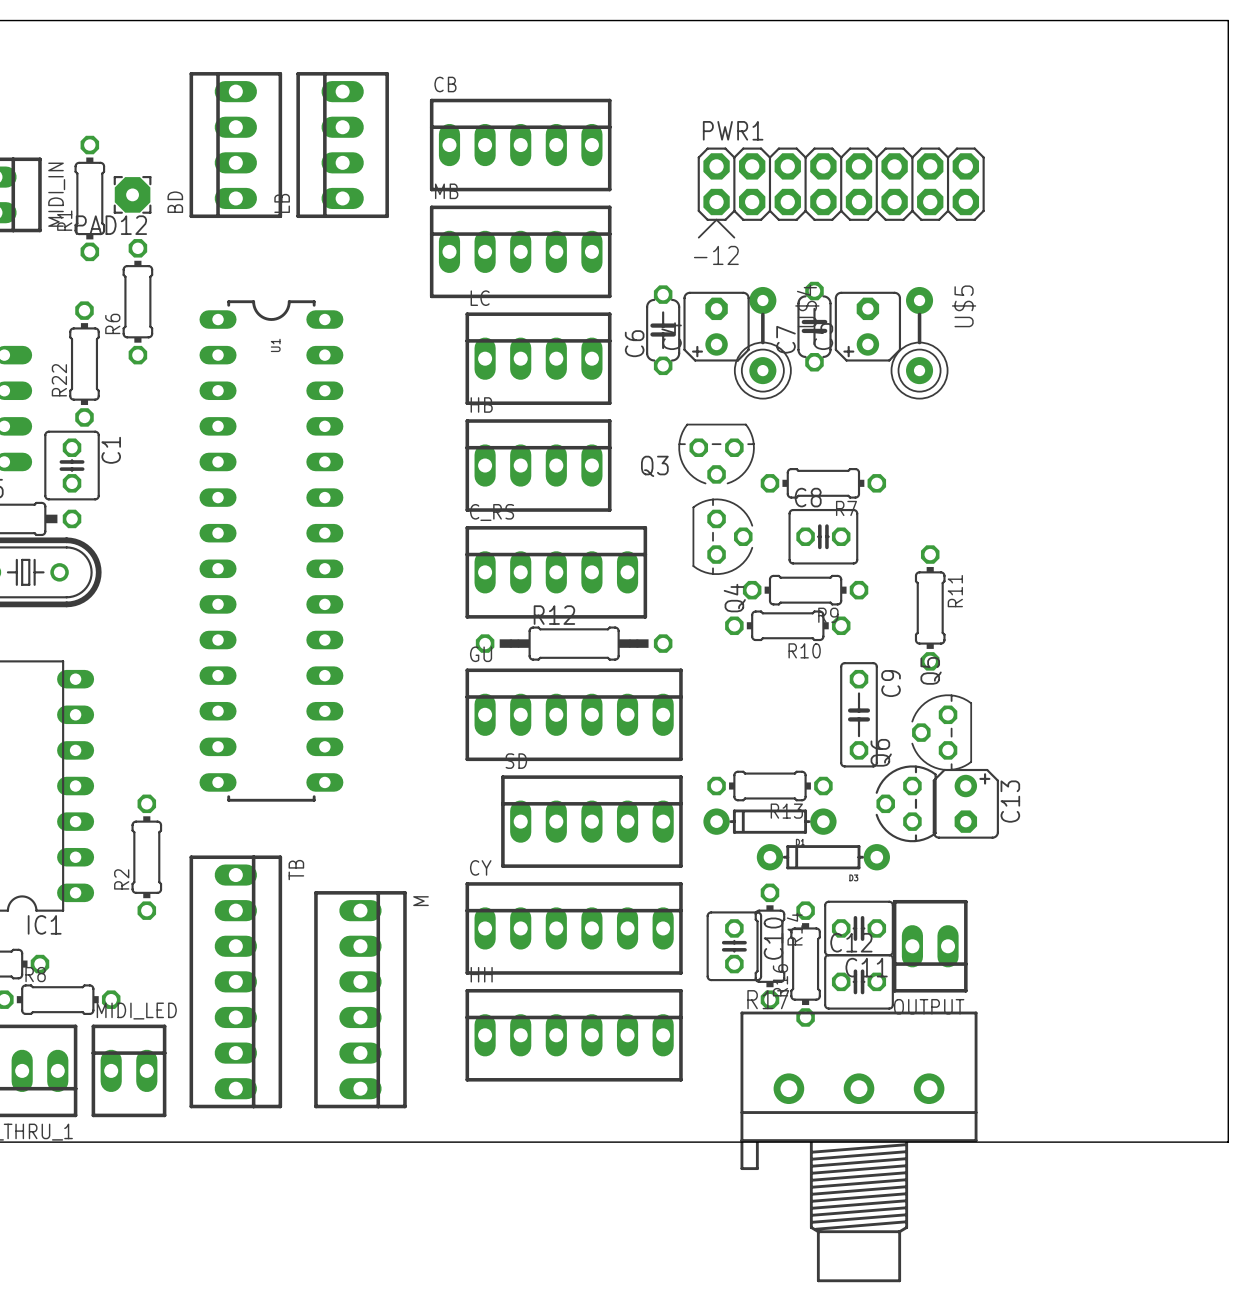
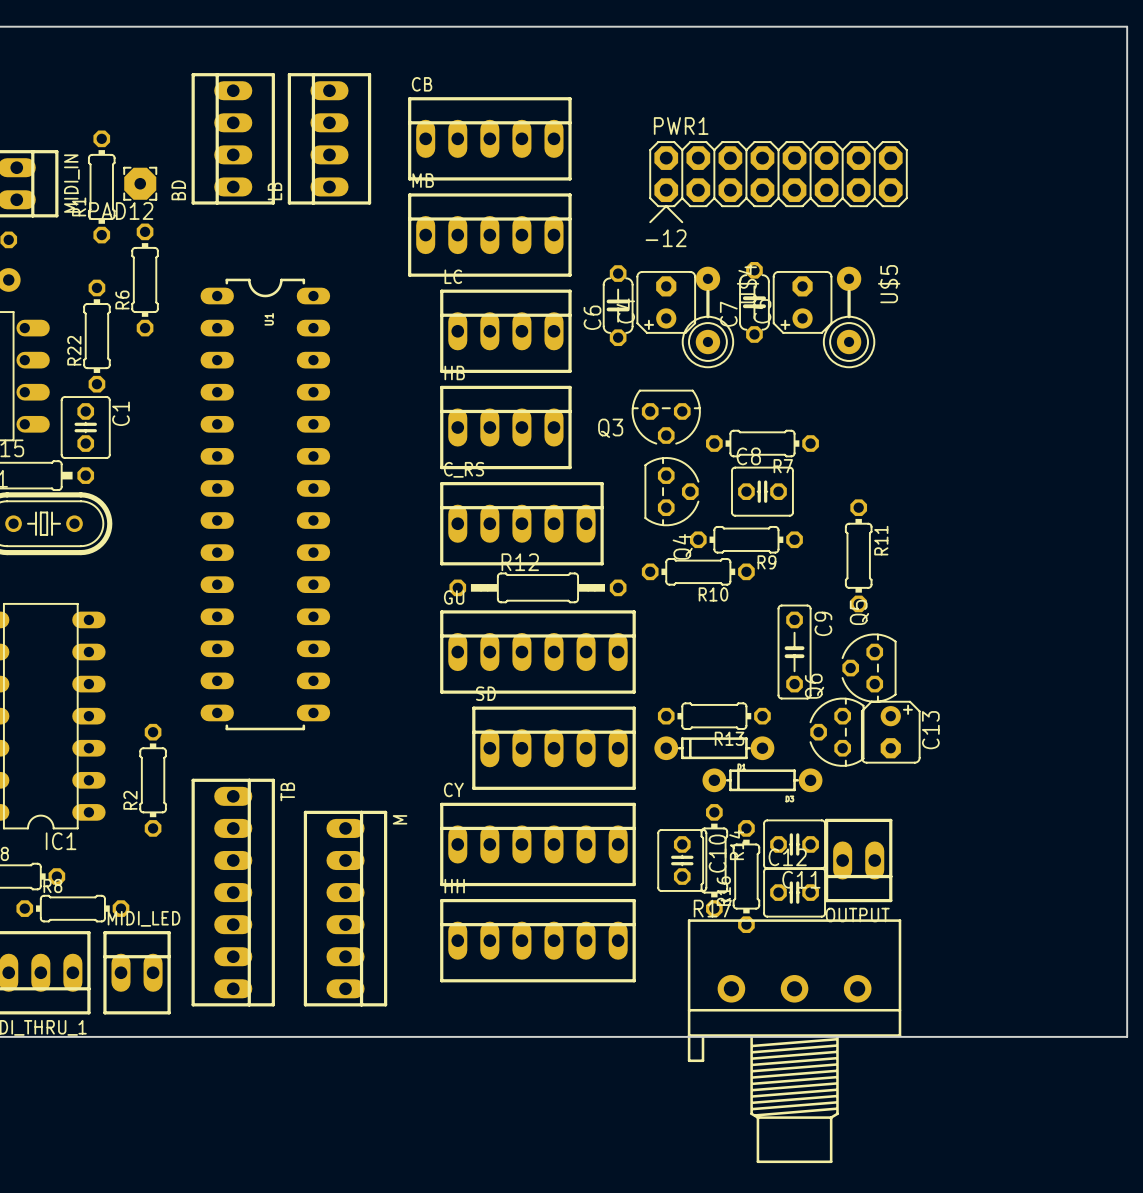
R10 position: (787, 625) -> (698, 571)

